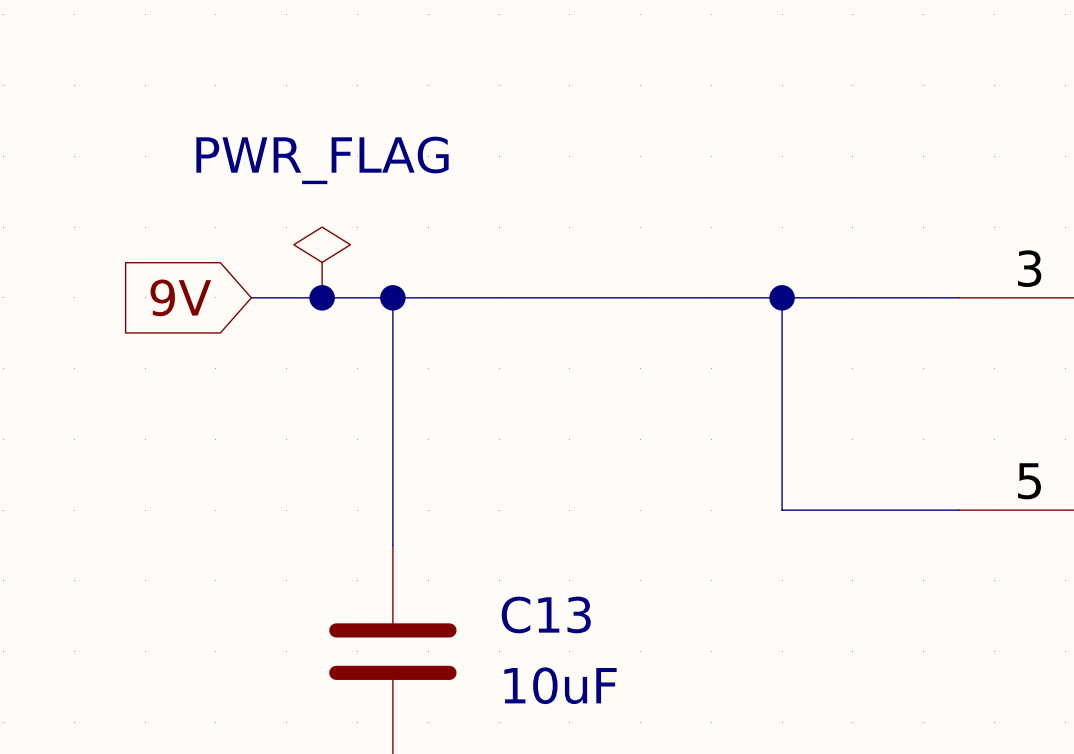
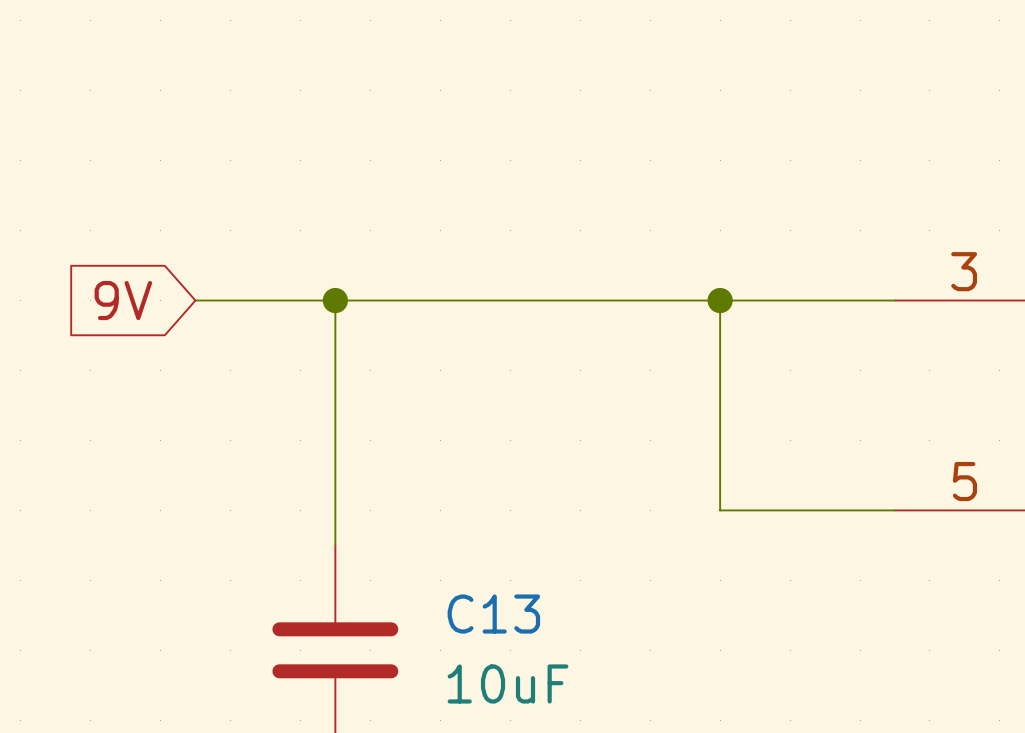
power symbol: PWR_FLAG (322, 262) -> none
junction: (322, 297) -> none

